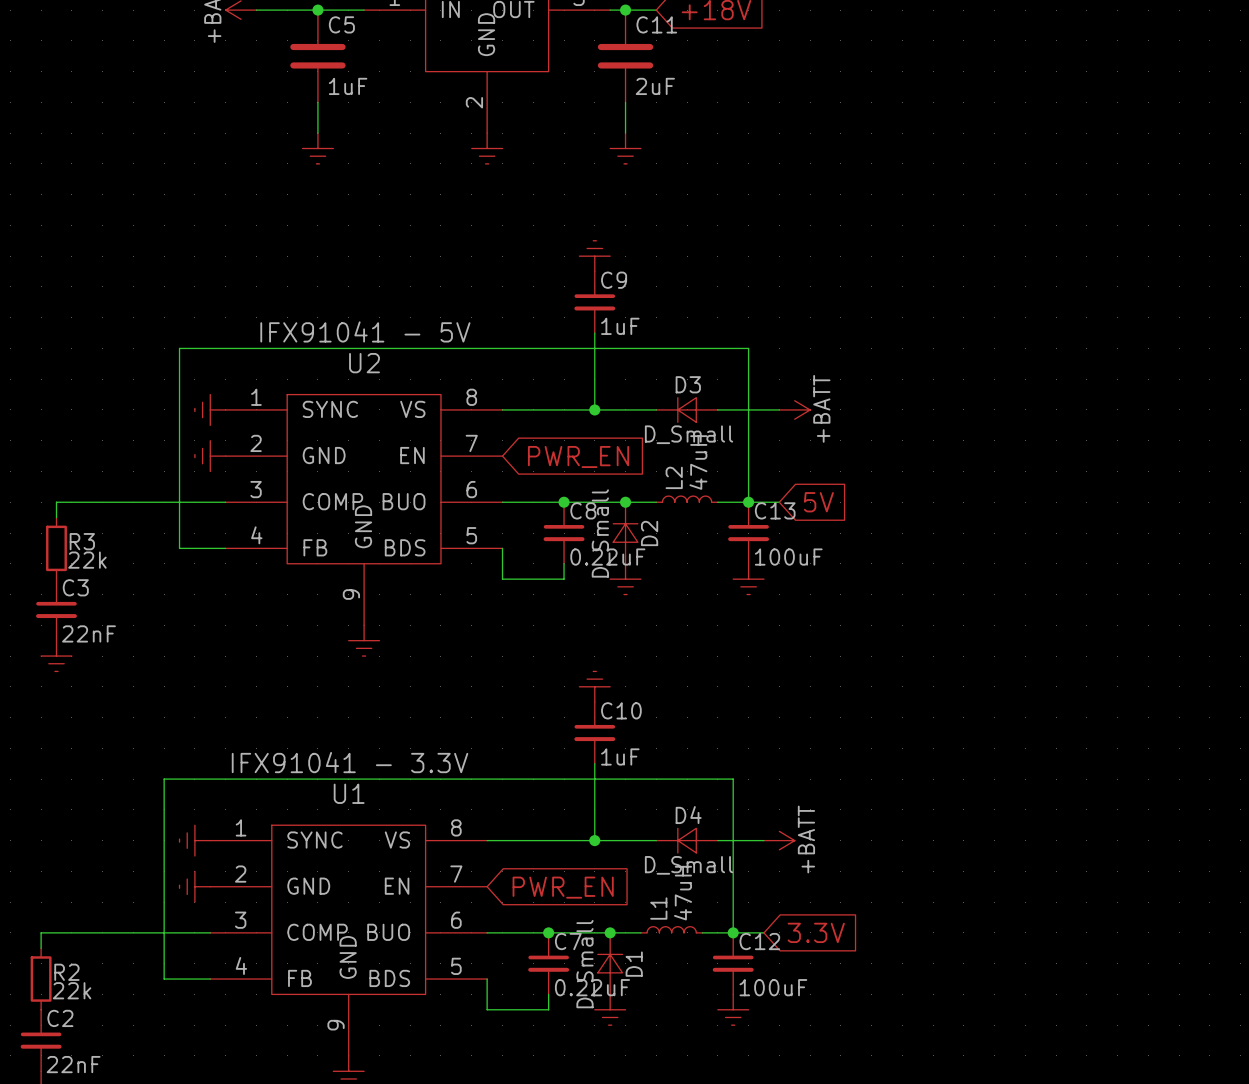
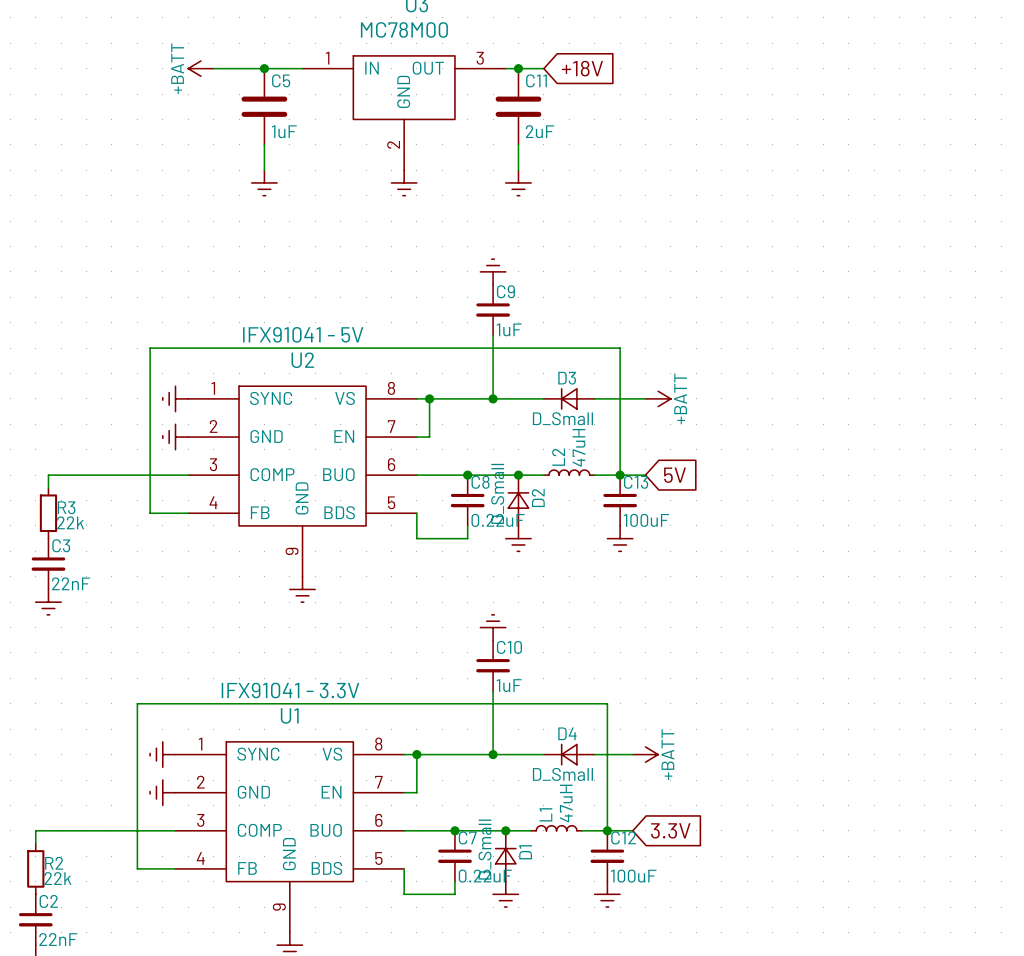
wire: none -> (429, 398) (429, 437) (416, 437)
junction: none -> (429, 398)
global label: PWR_EN (578, 456) -> none
wire: none -> (416, 754) (416, 792) (404, 792)
junction: none -> (416, 754)
global label: PWR_EN (563, 887) -> none

